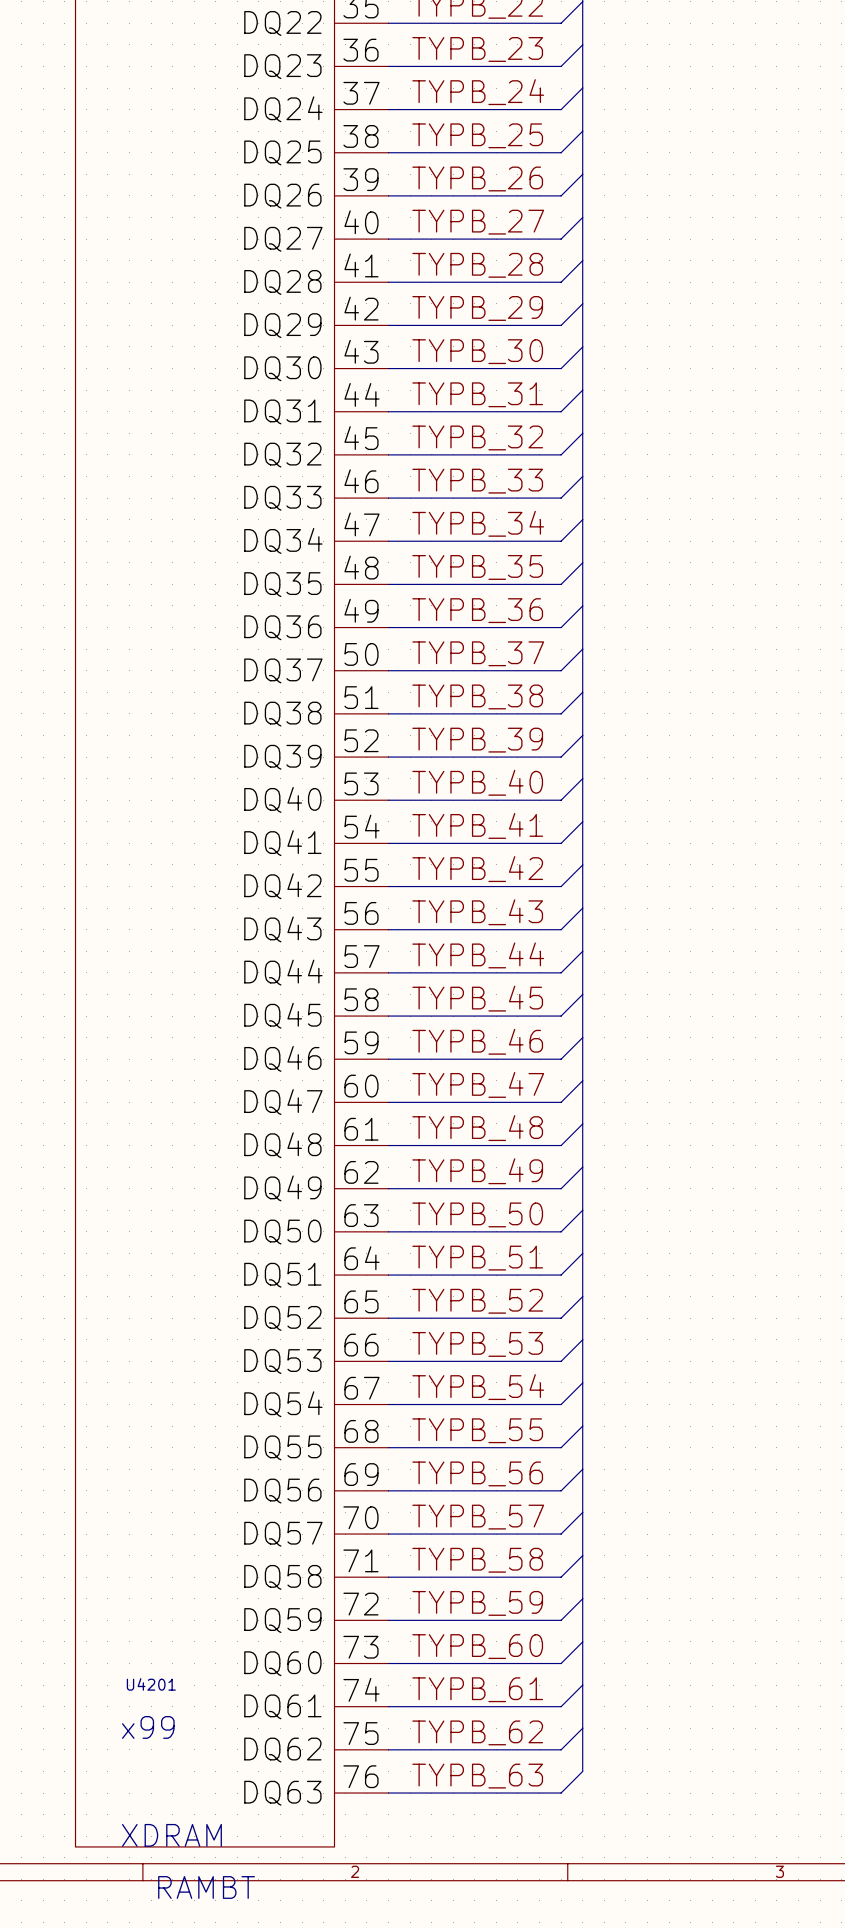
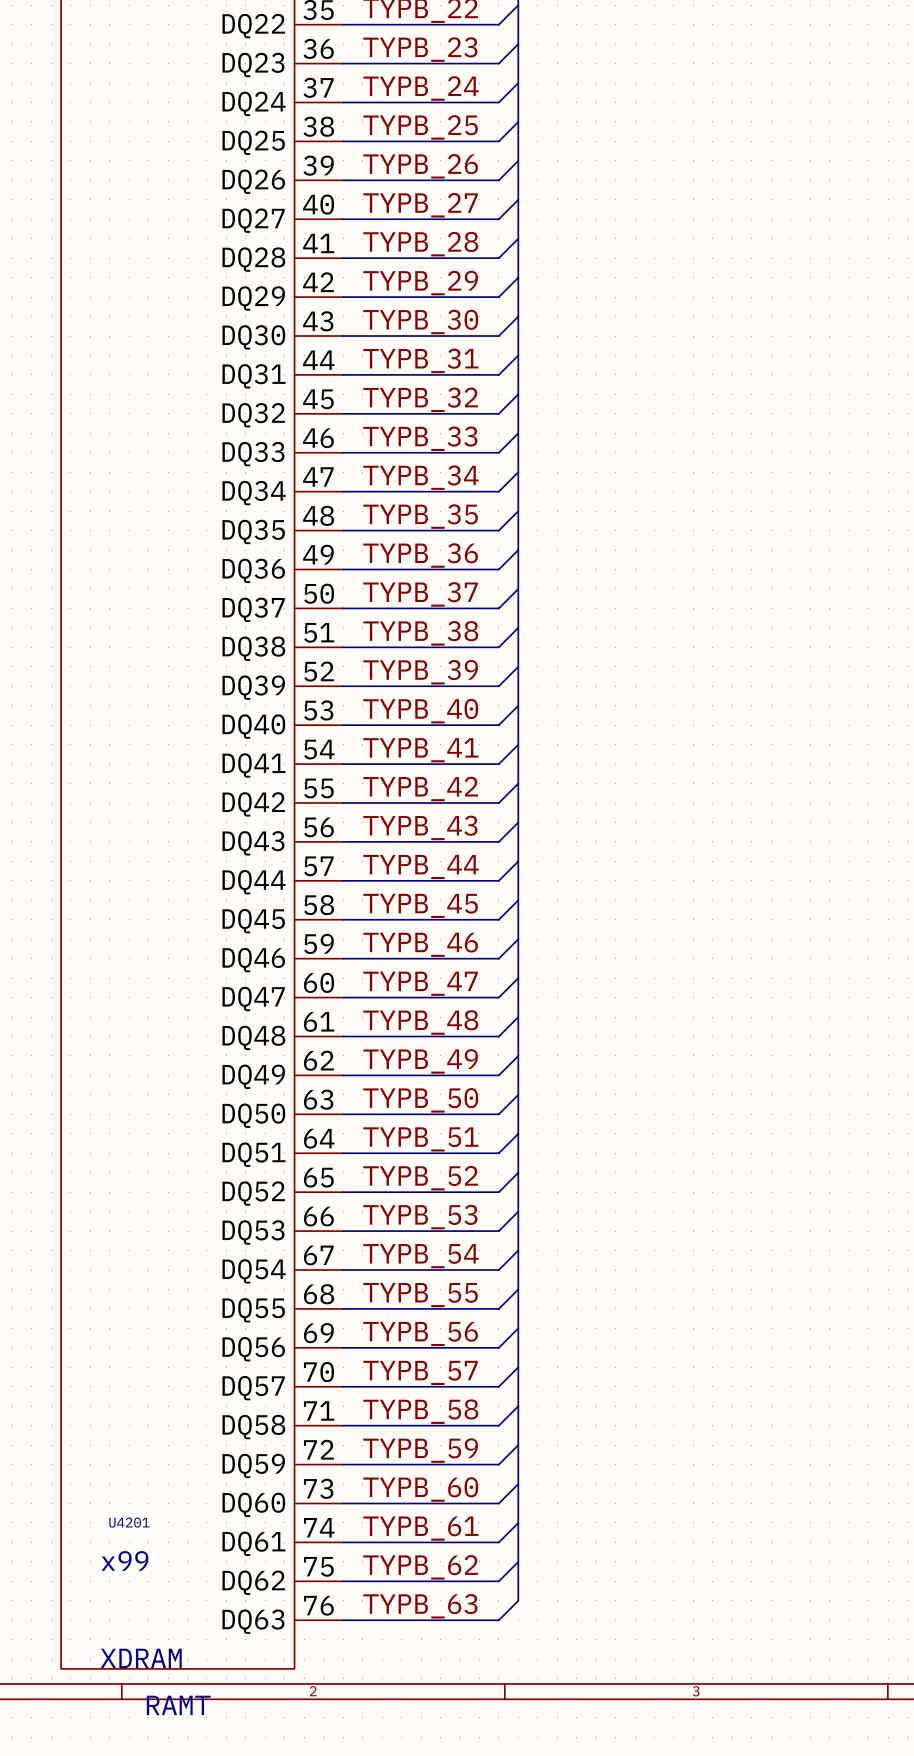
U4201 text: RAMBT (206, 1887) -> RAMT (178, 1705)

